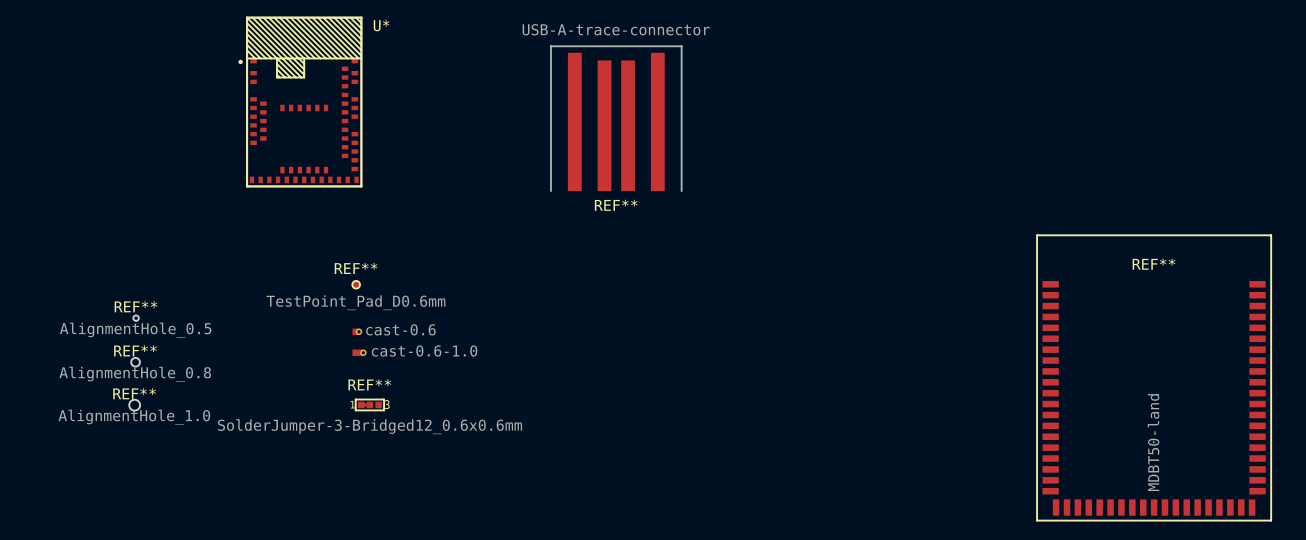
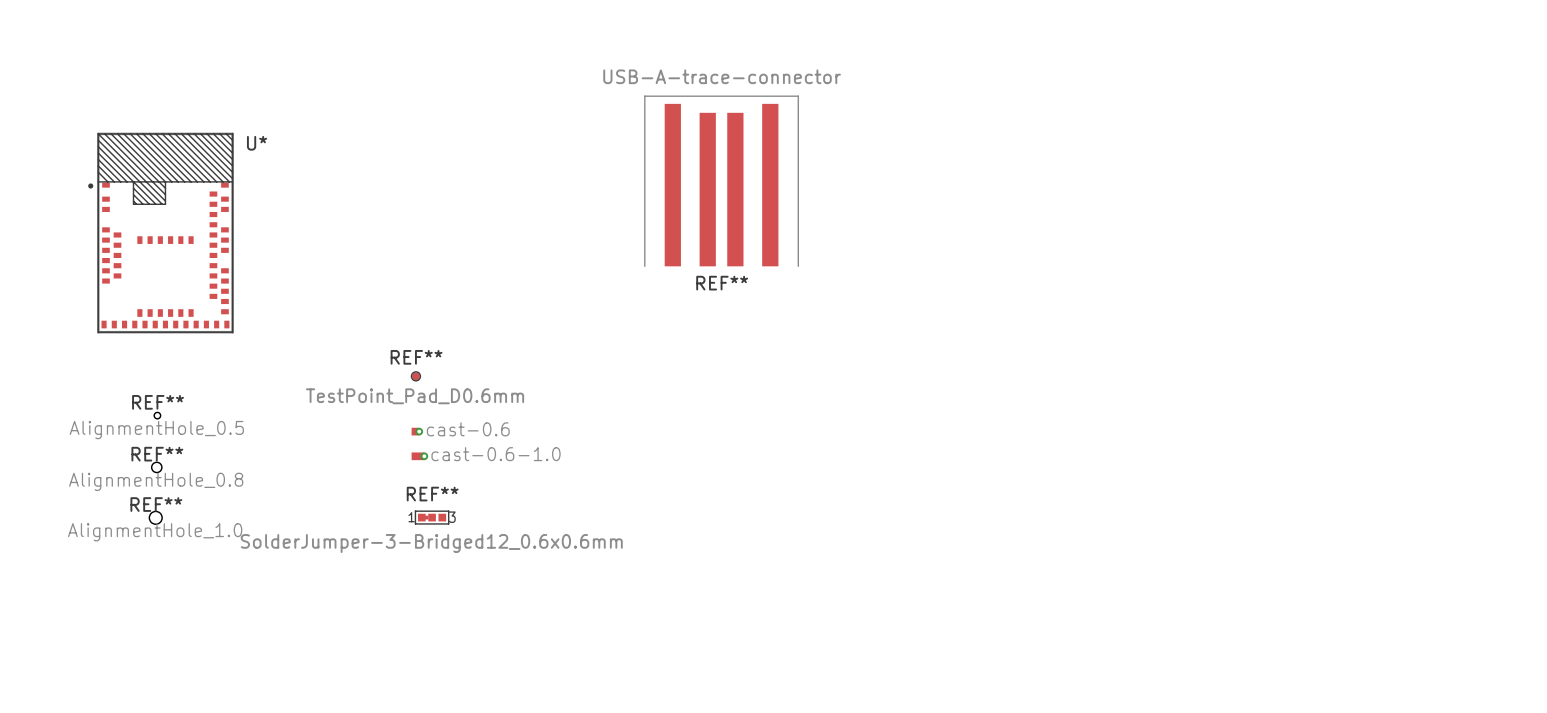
U* position: (300, 102) -> (161, 233)
REF**: MDBT50-land (1154, 377) -> none

